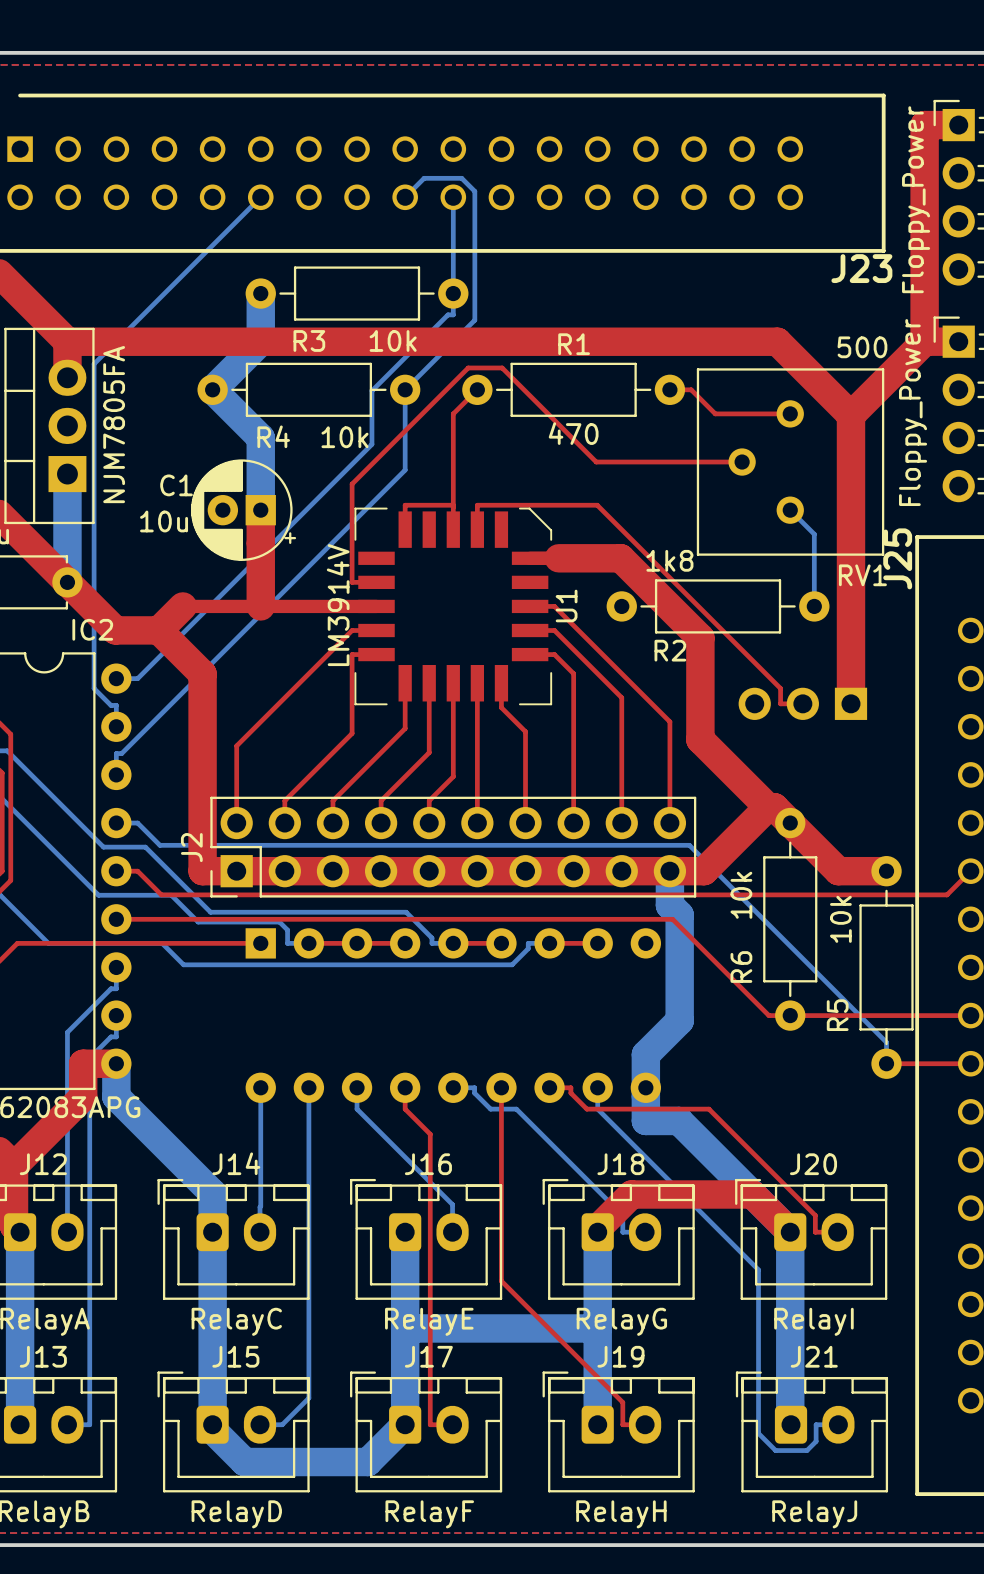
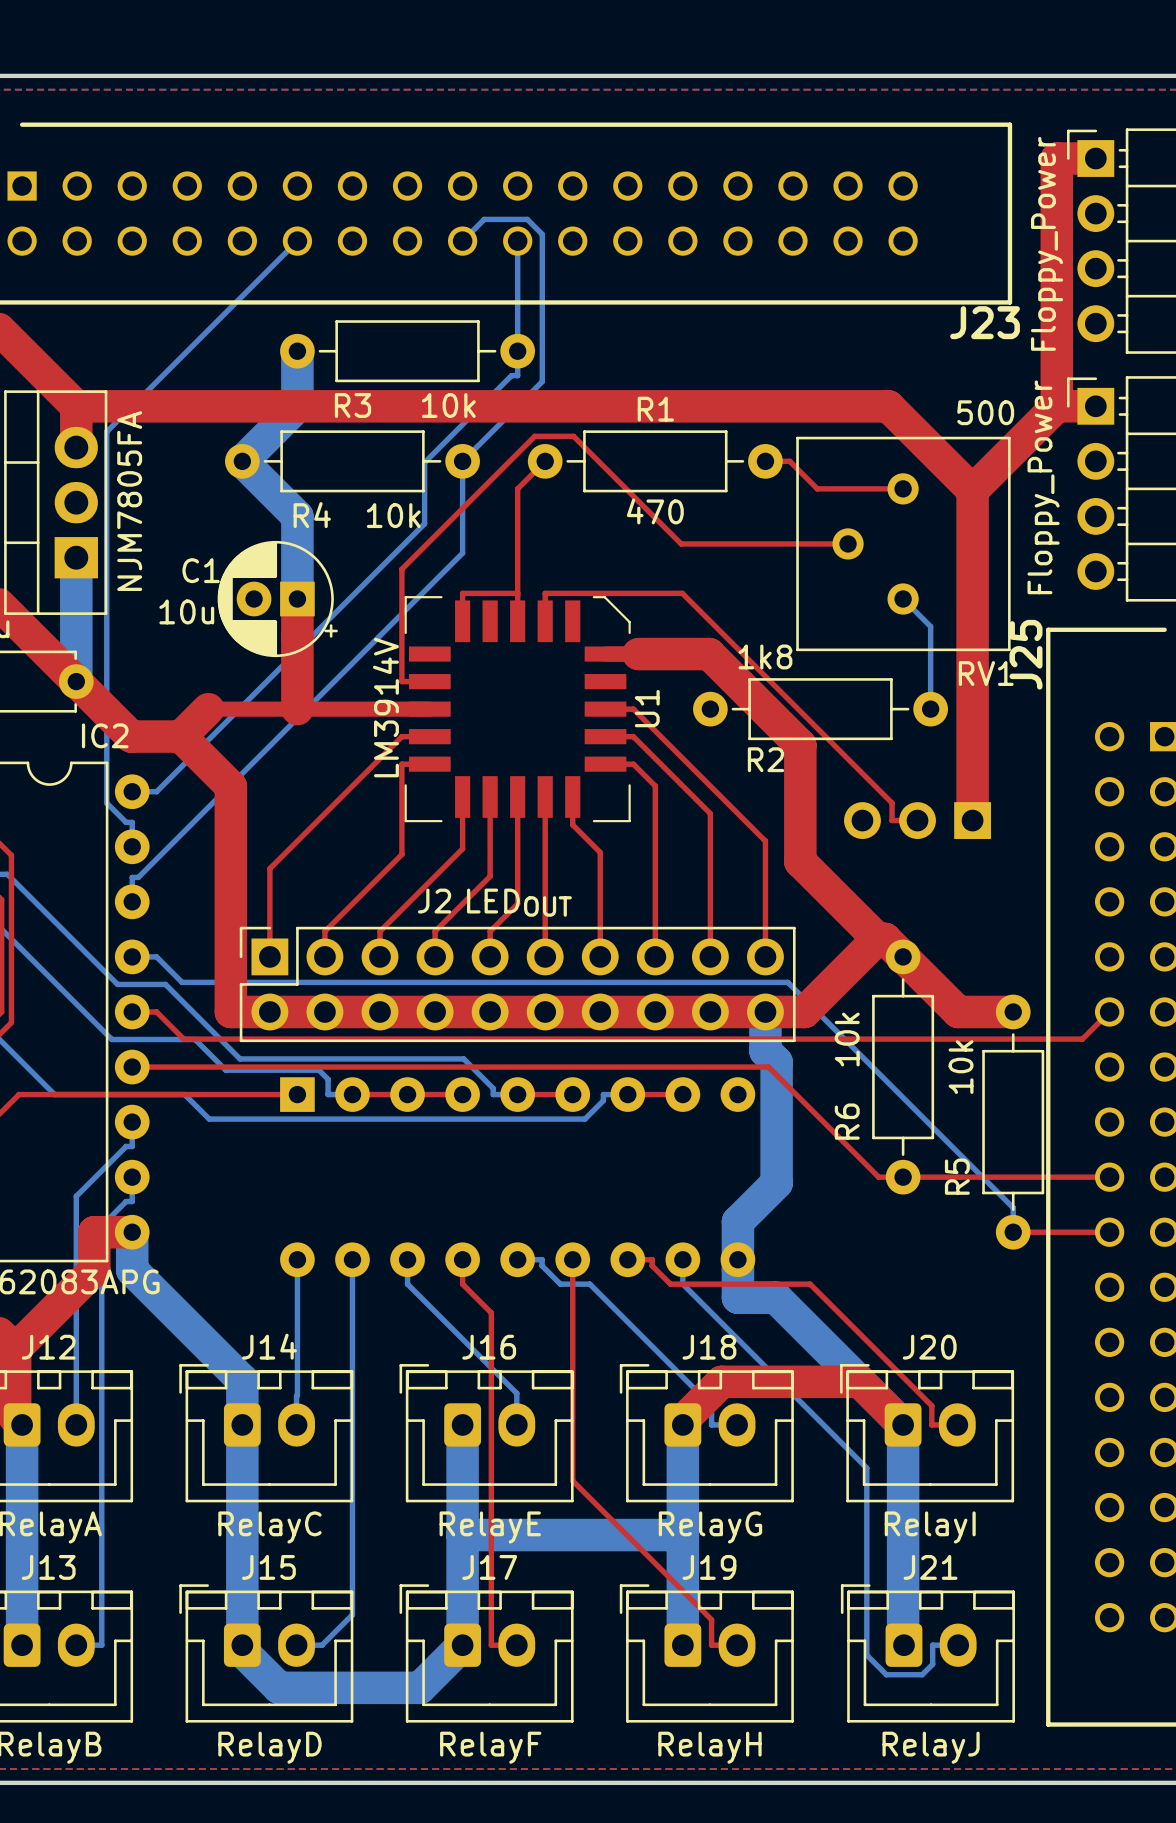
J2 value: none -> LEDOUT (519, 902)
J2 footprint: [210, 796, 697, 898] -> [239, 926, 796, 1043]
J2 name position: J2 (191, 847) -> J2 (434, 901)

